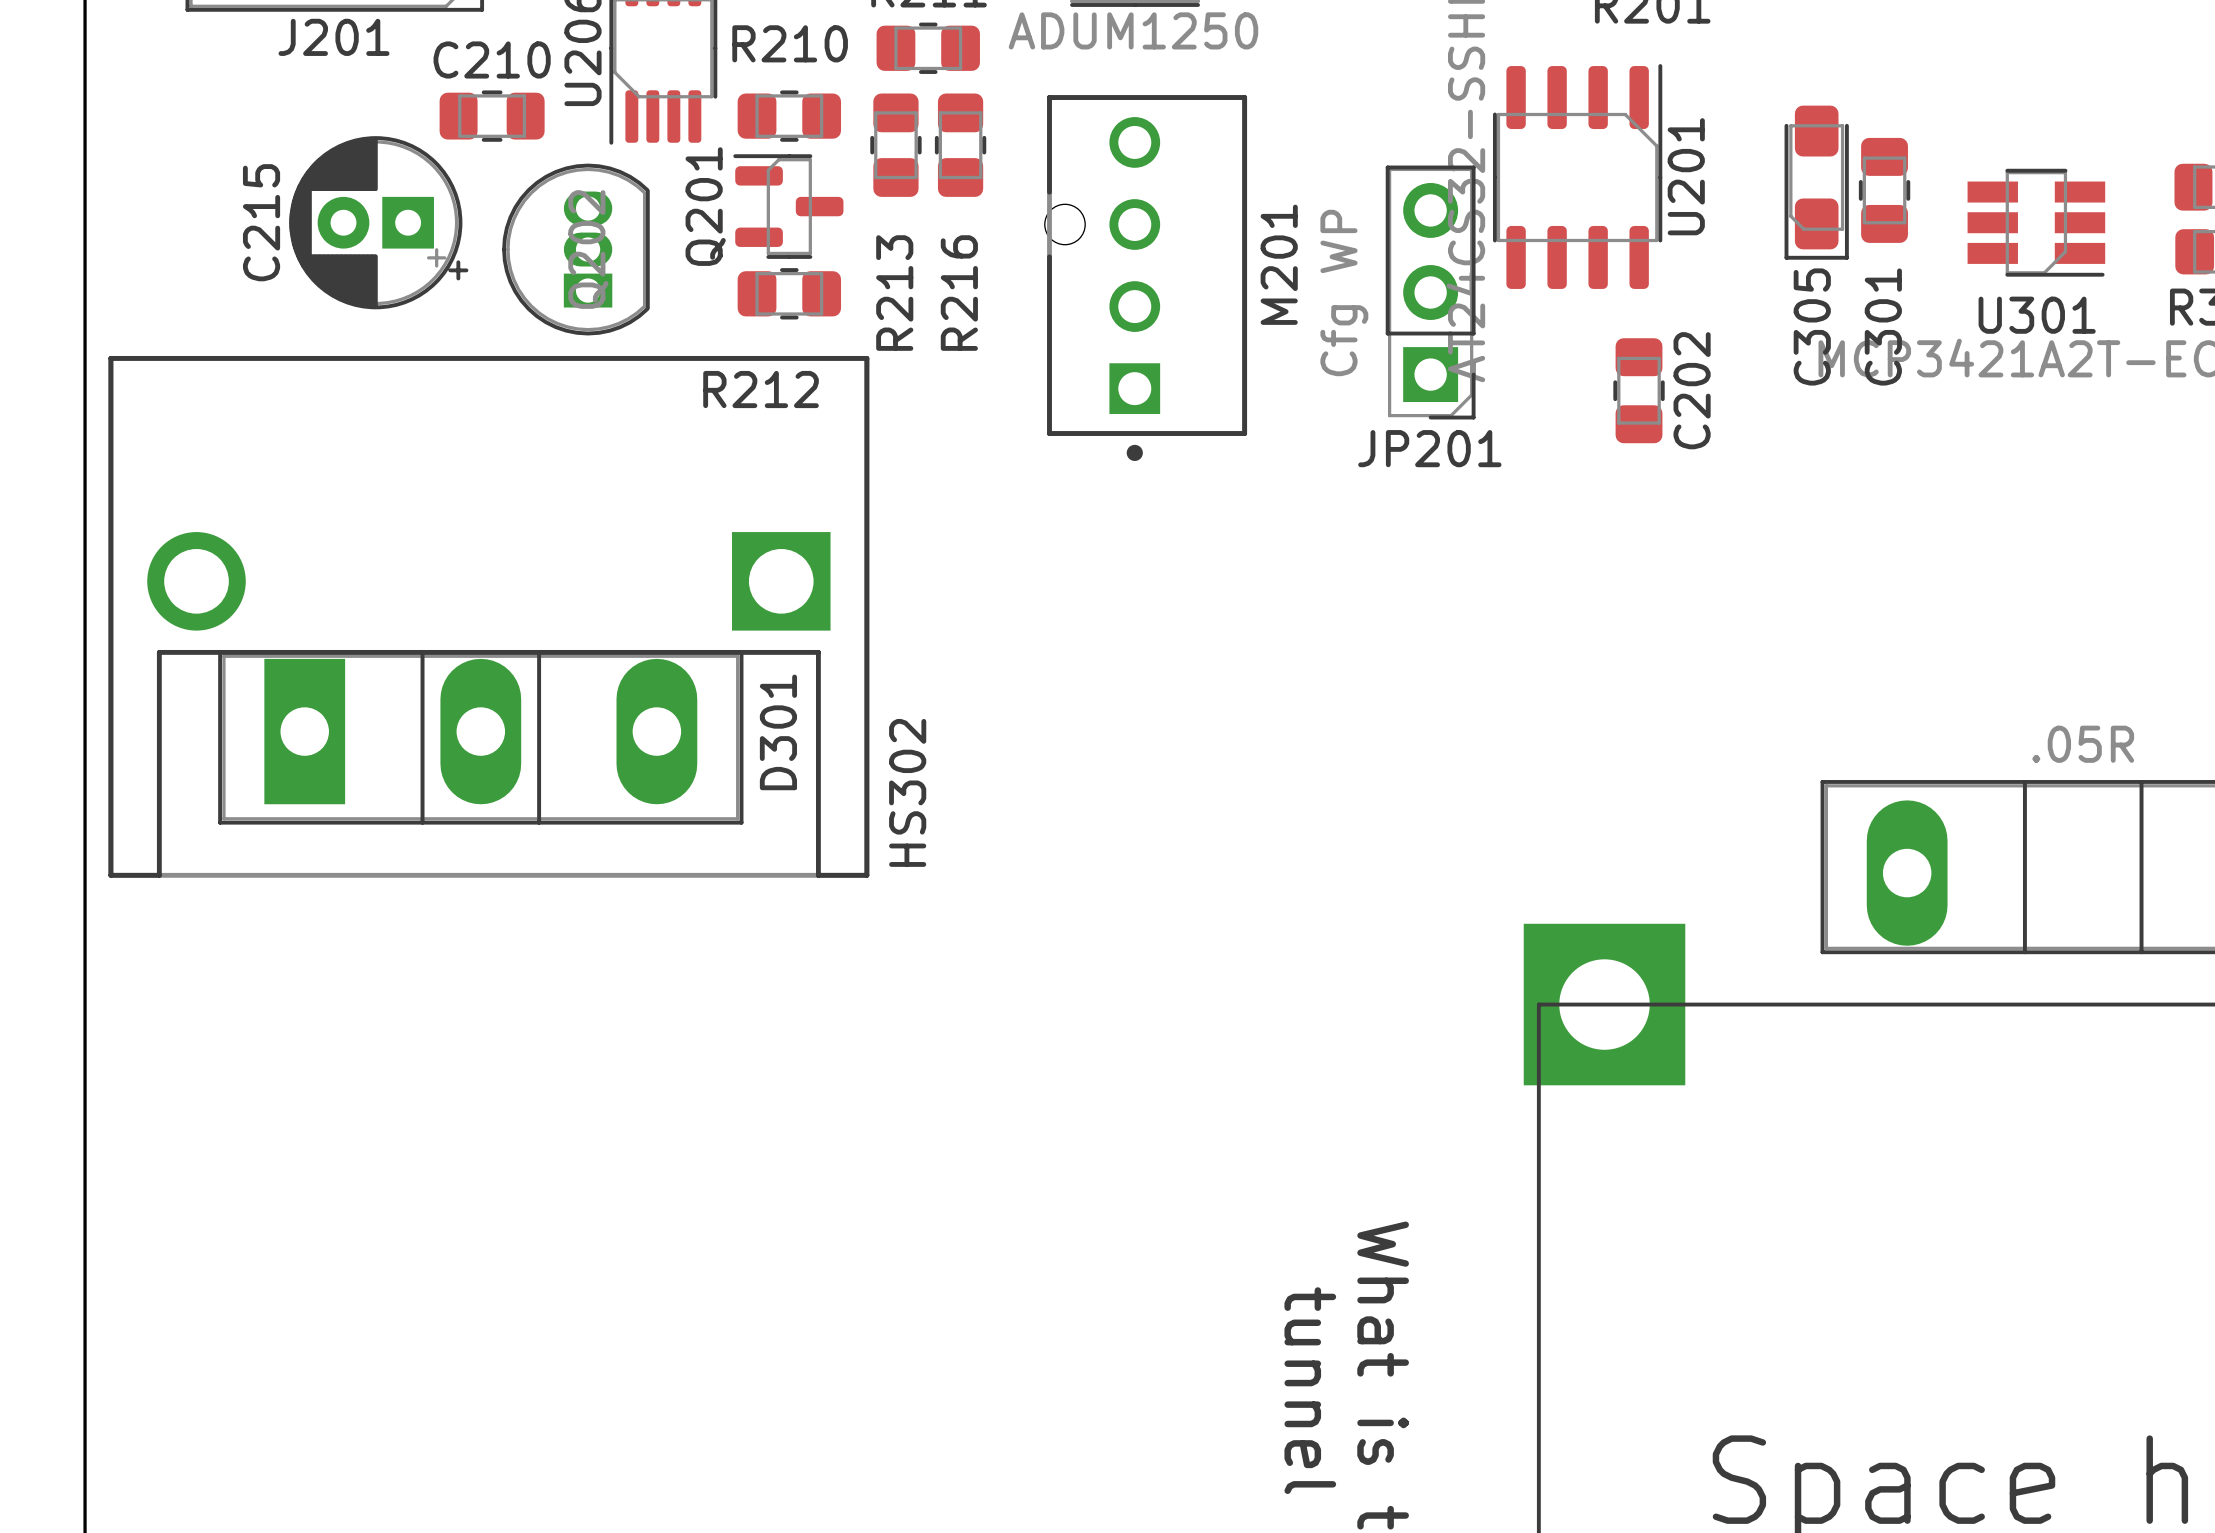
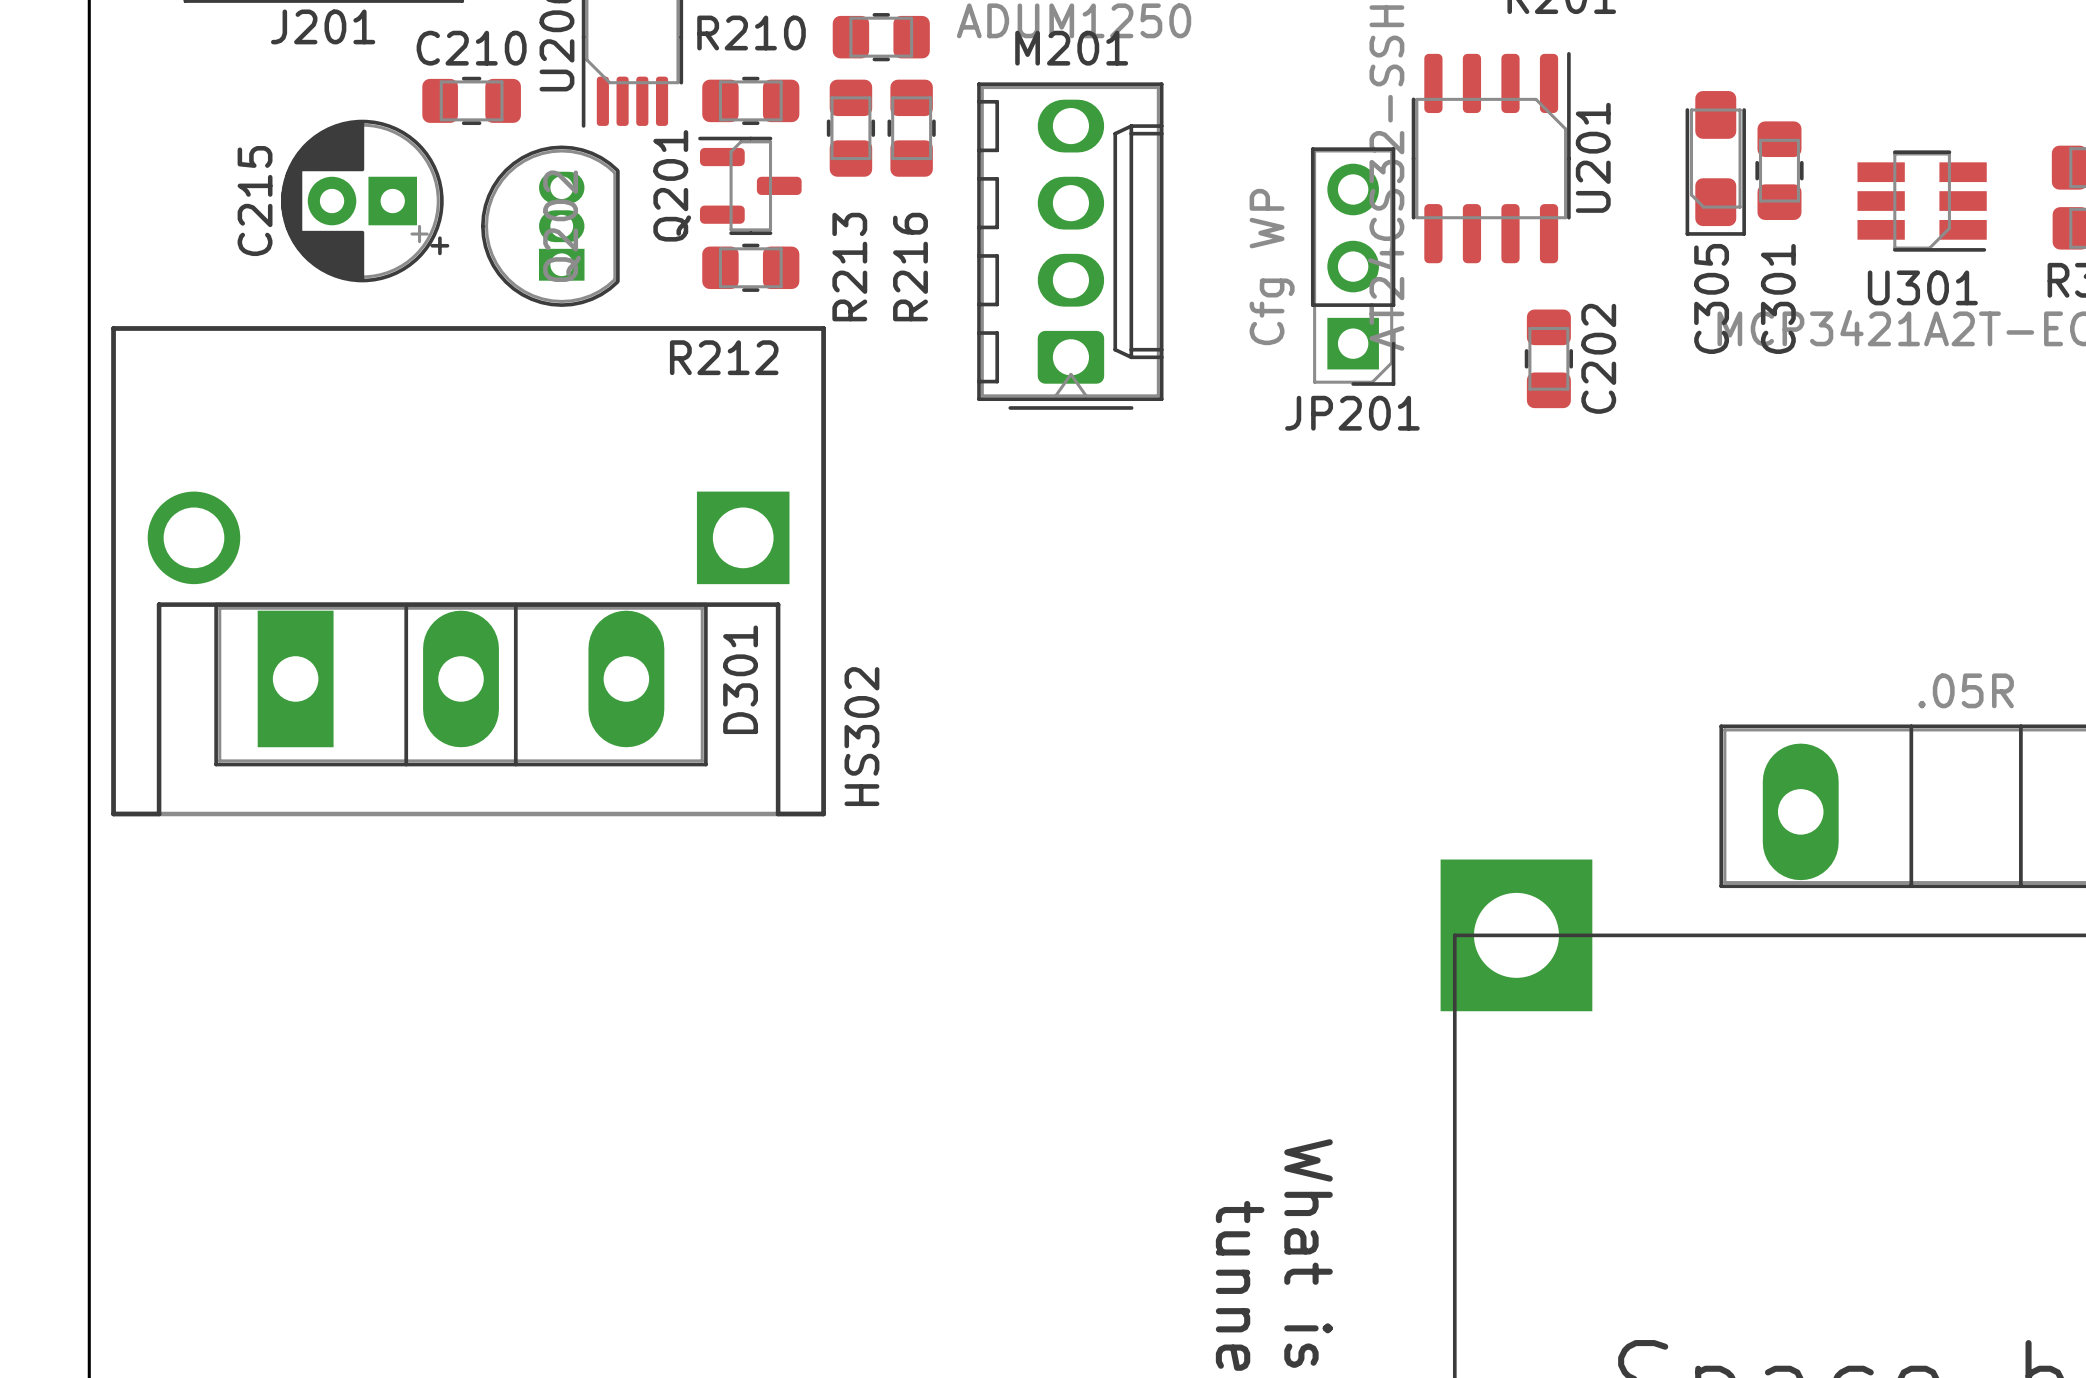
M201 footprint: [1044, 95, 1248, 461] -> [977, 82, 1164, 410]
M201 name position: M201 (1279, 264) -> M201 (1071, 48)

